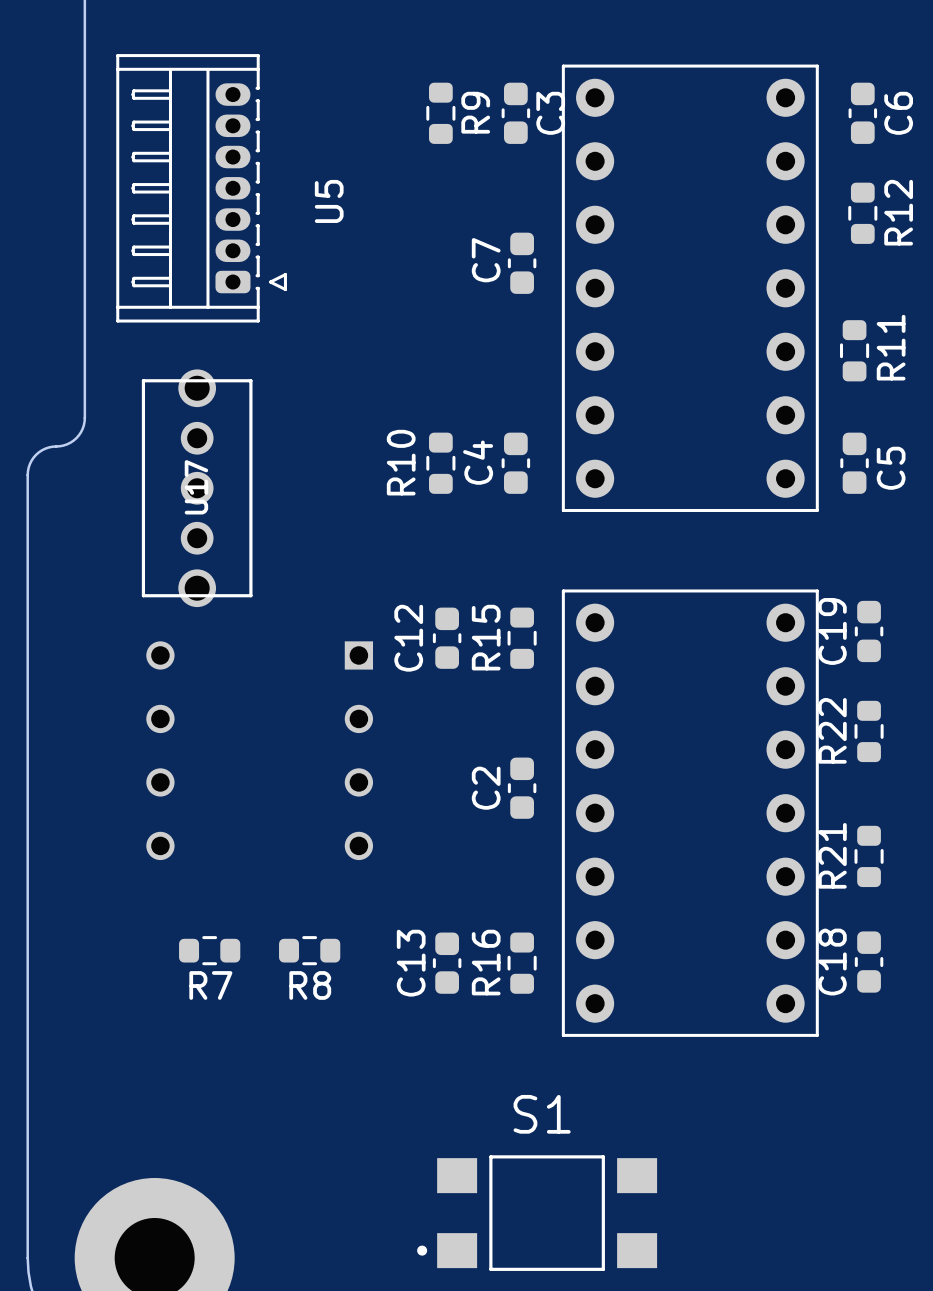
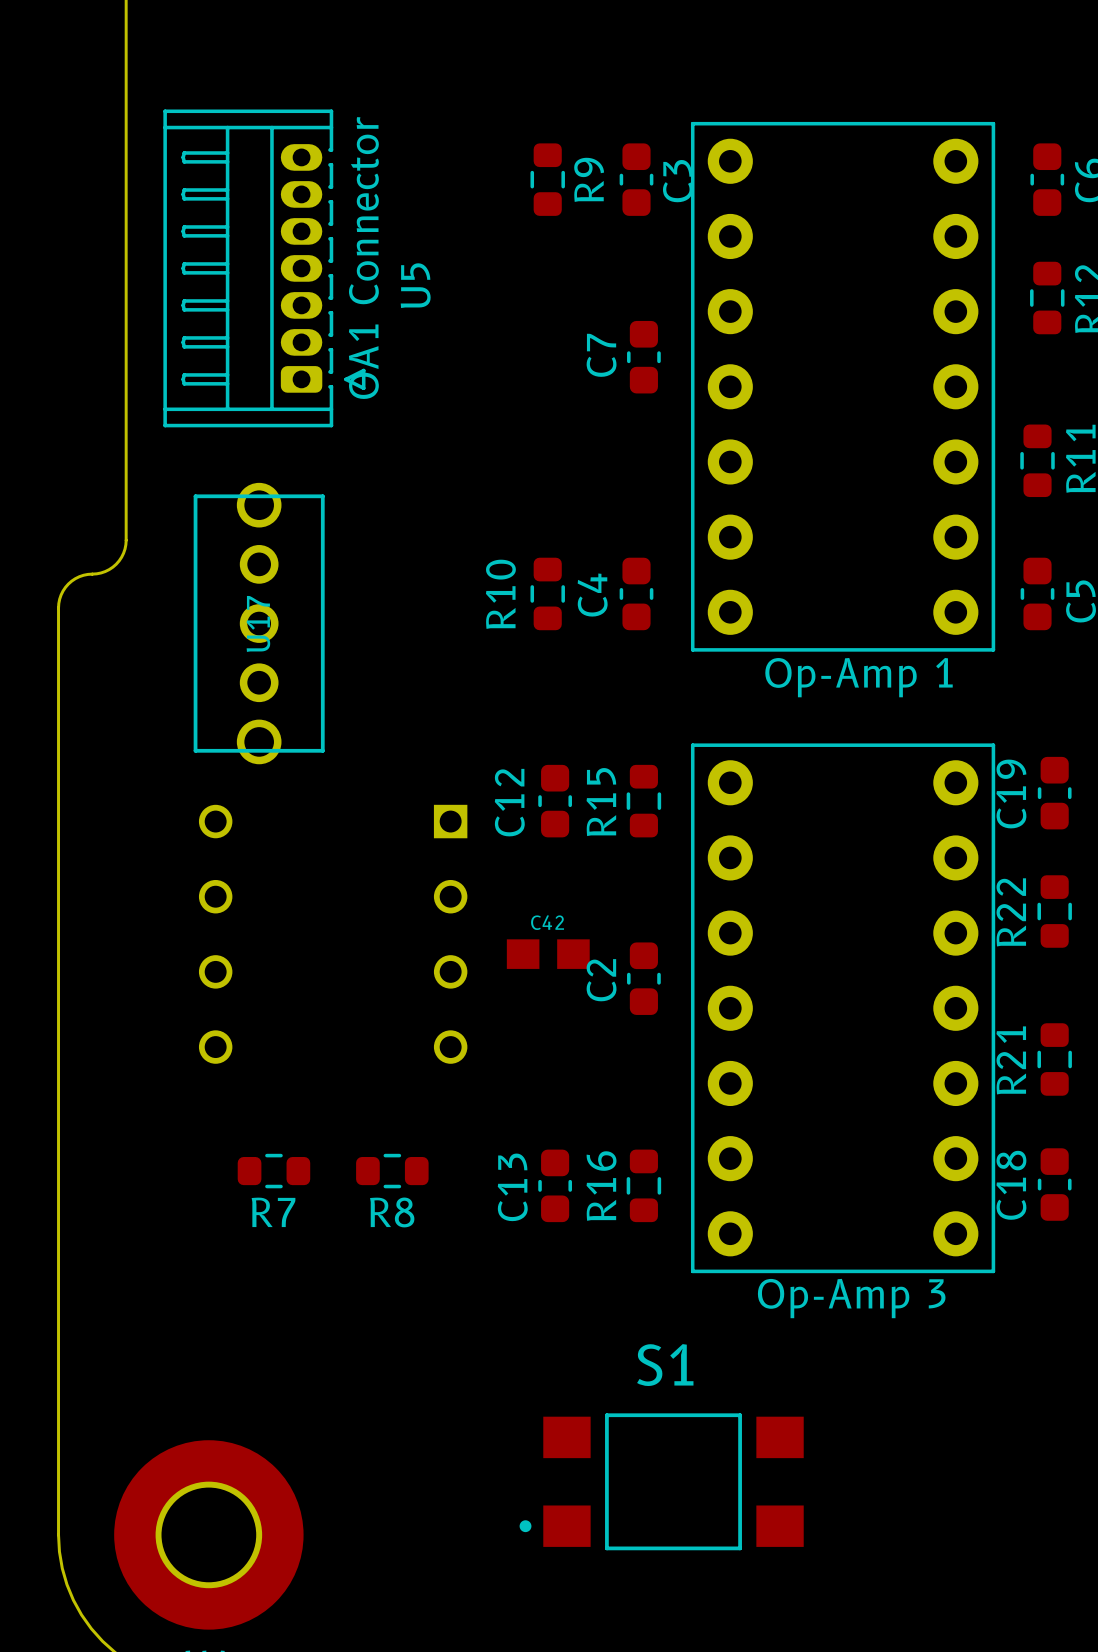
U5 text: none -> OA1 Connector (363, 258)
part text: none -> Op-Amp 1 (859, 677)
C42: none -> (548, 954)
part text: none -> Op-Amp 3 (851, 1298)

